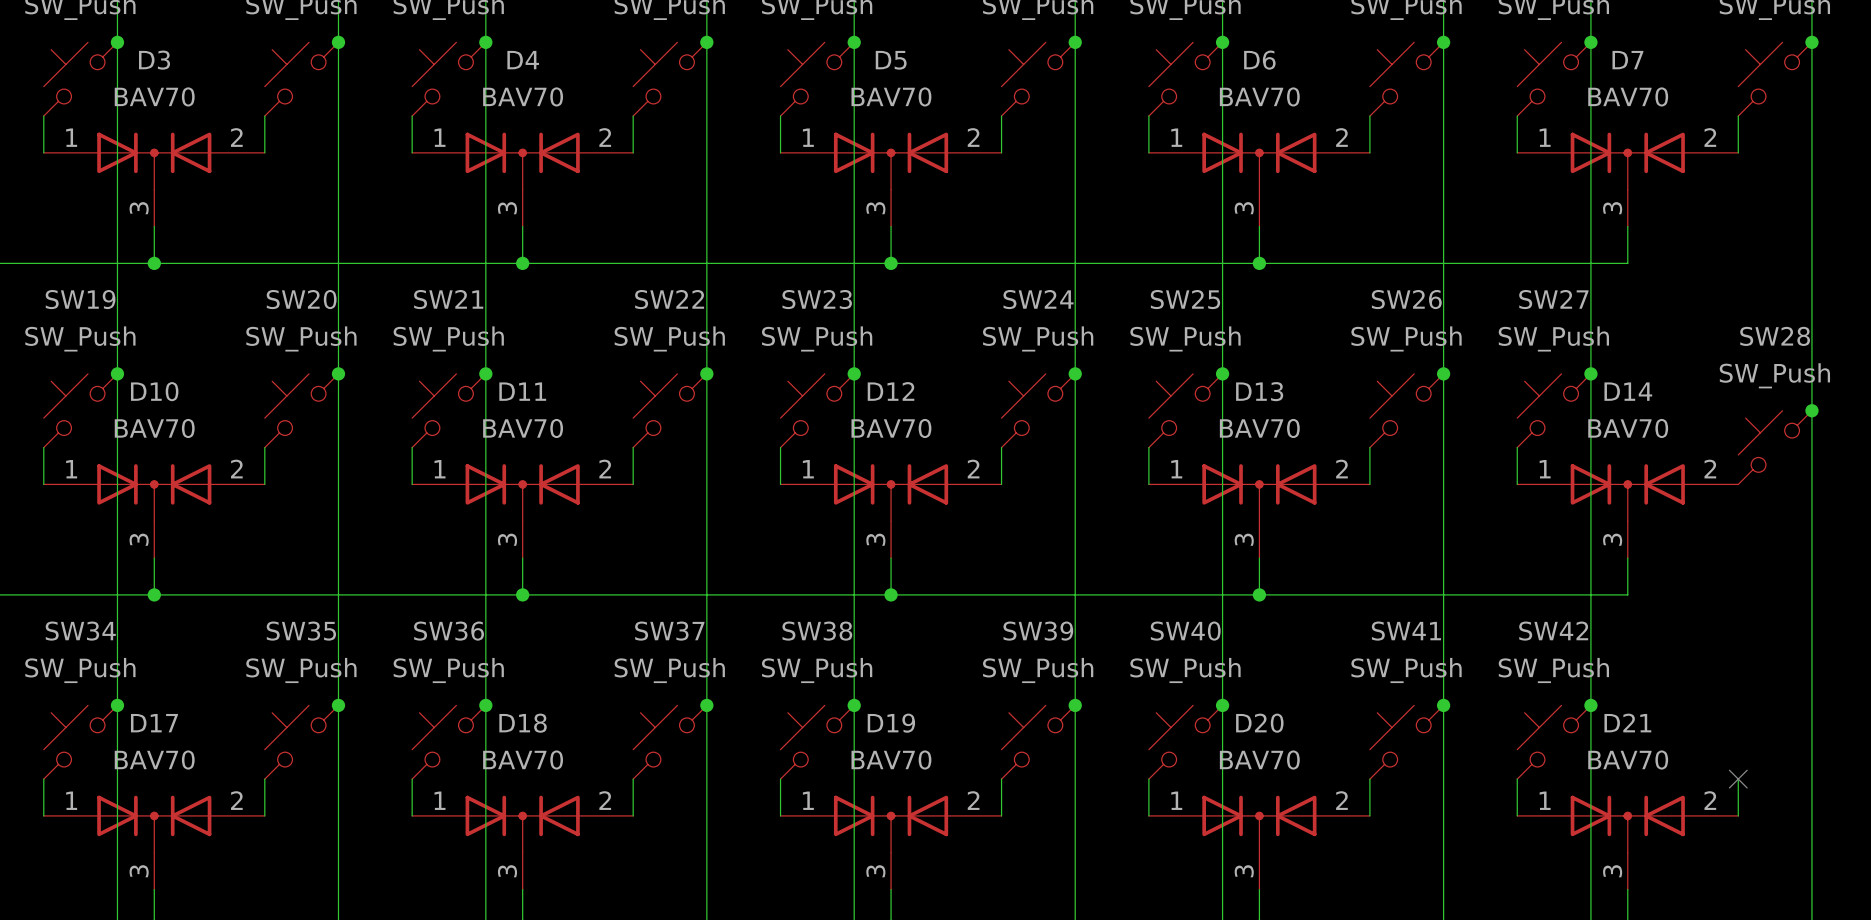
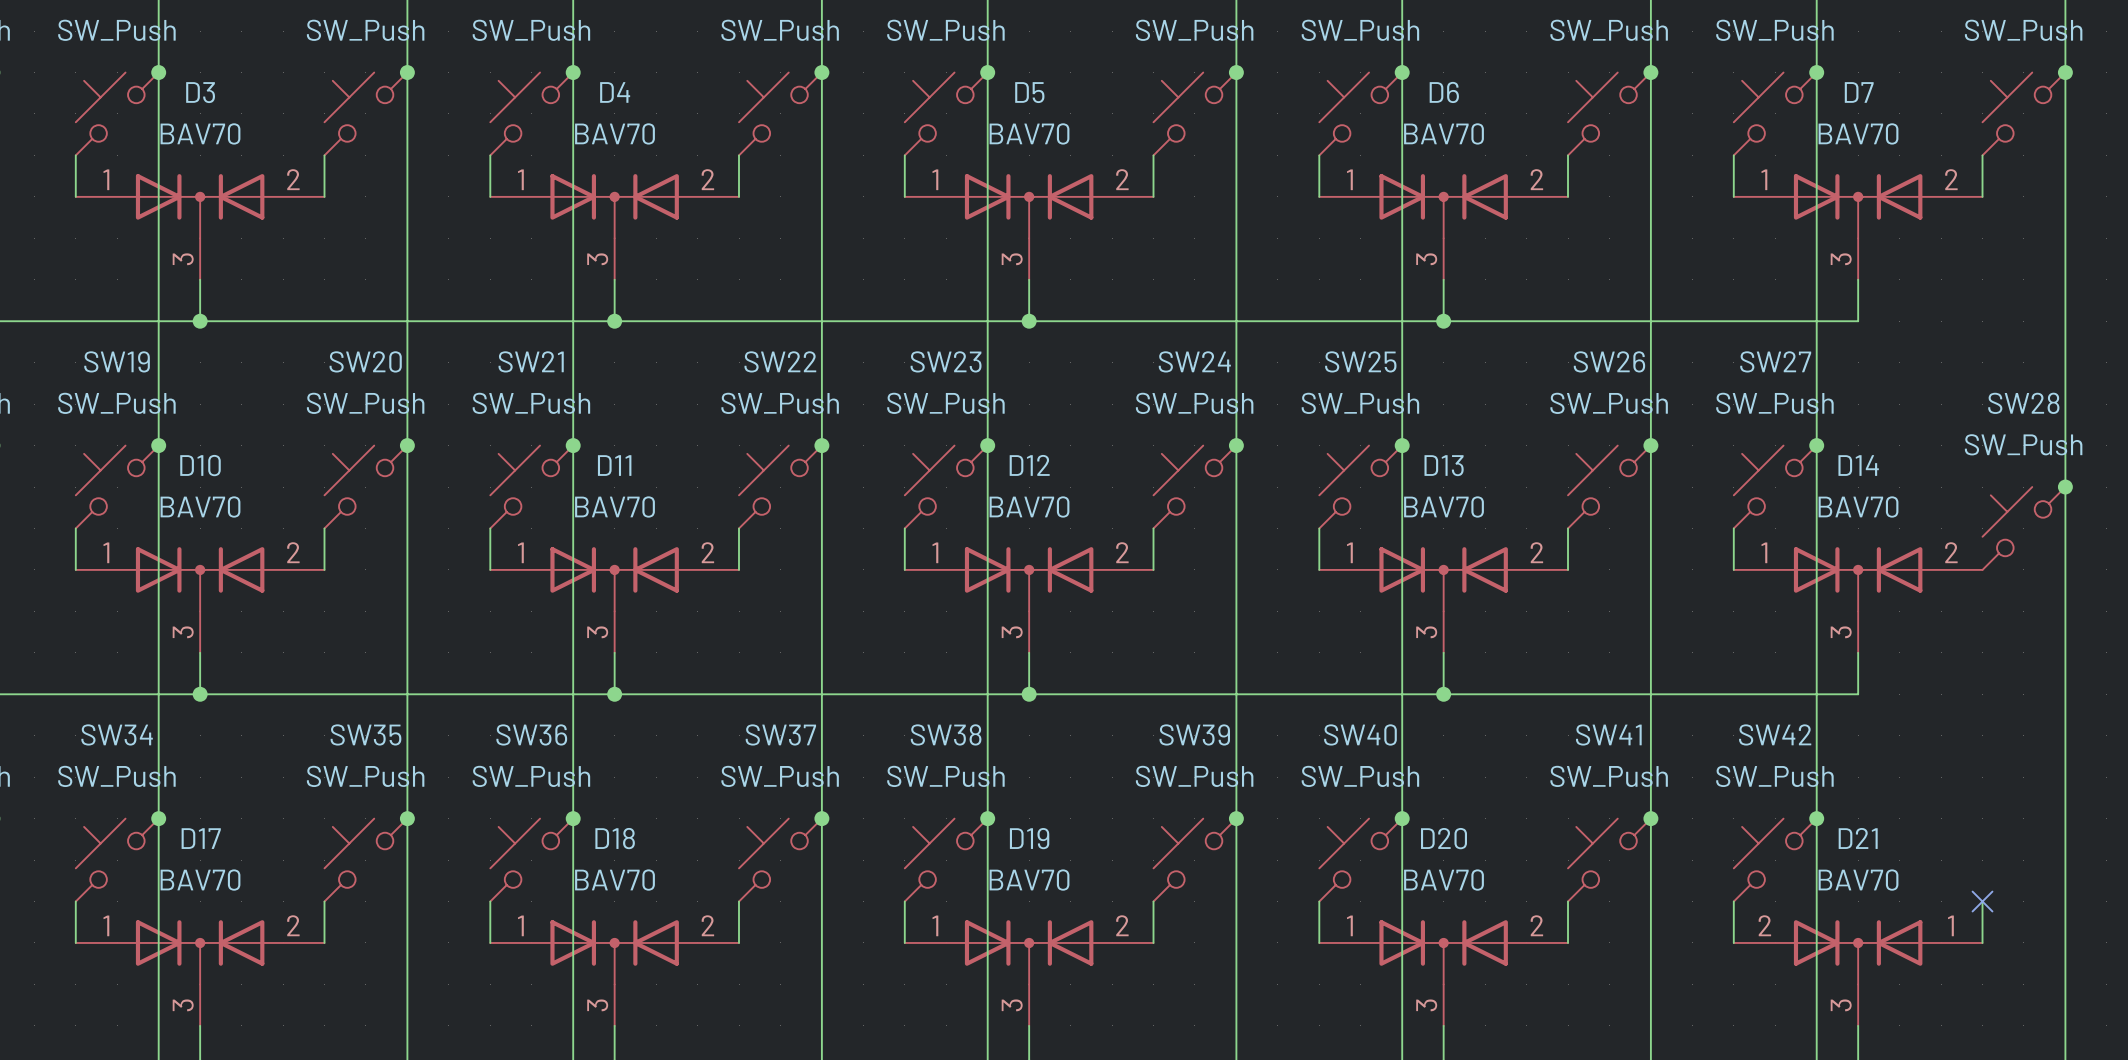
D21 flip: as is (1627, 824) -> left-right (1858, 952)

